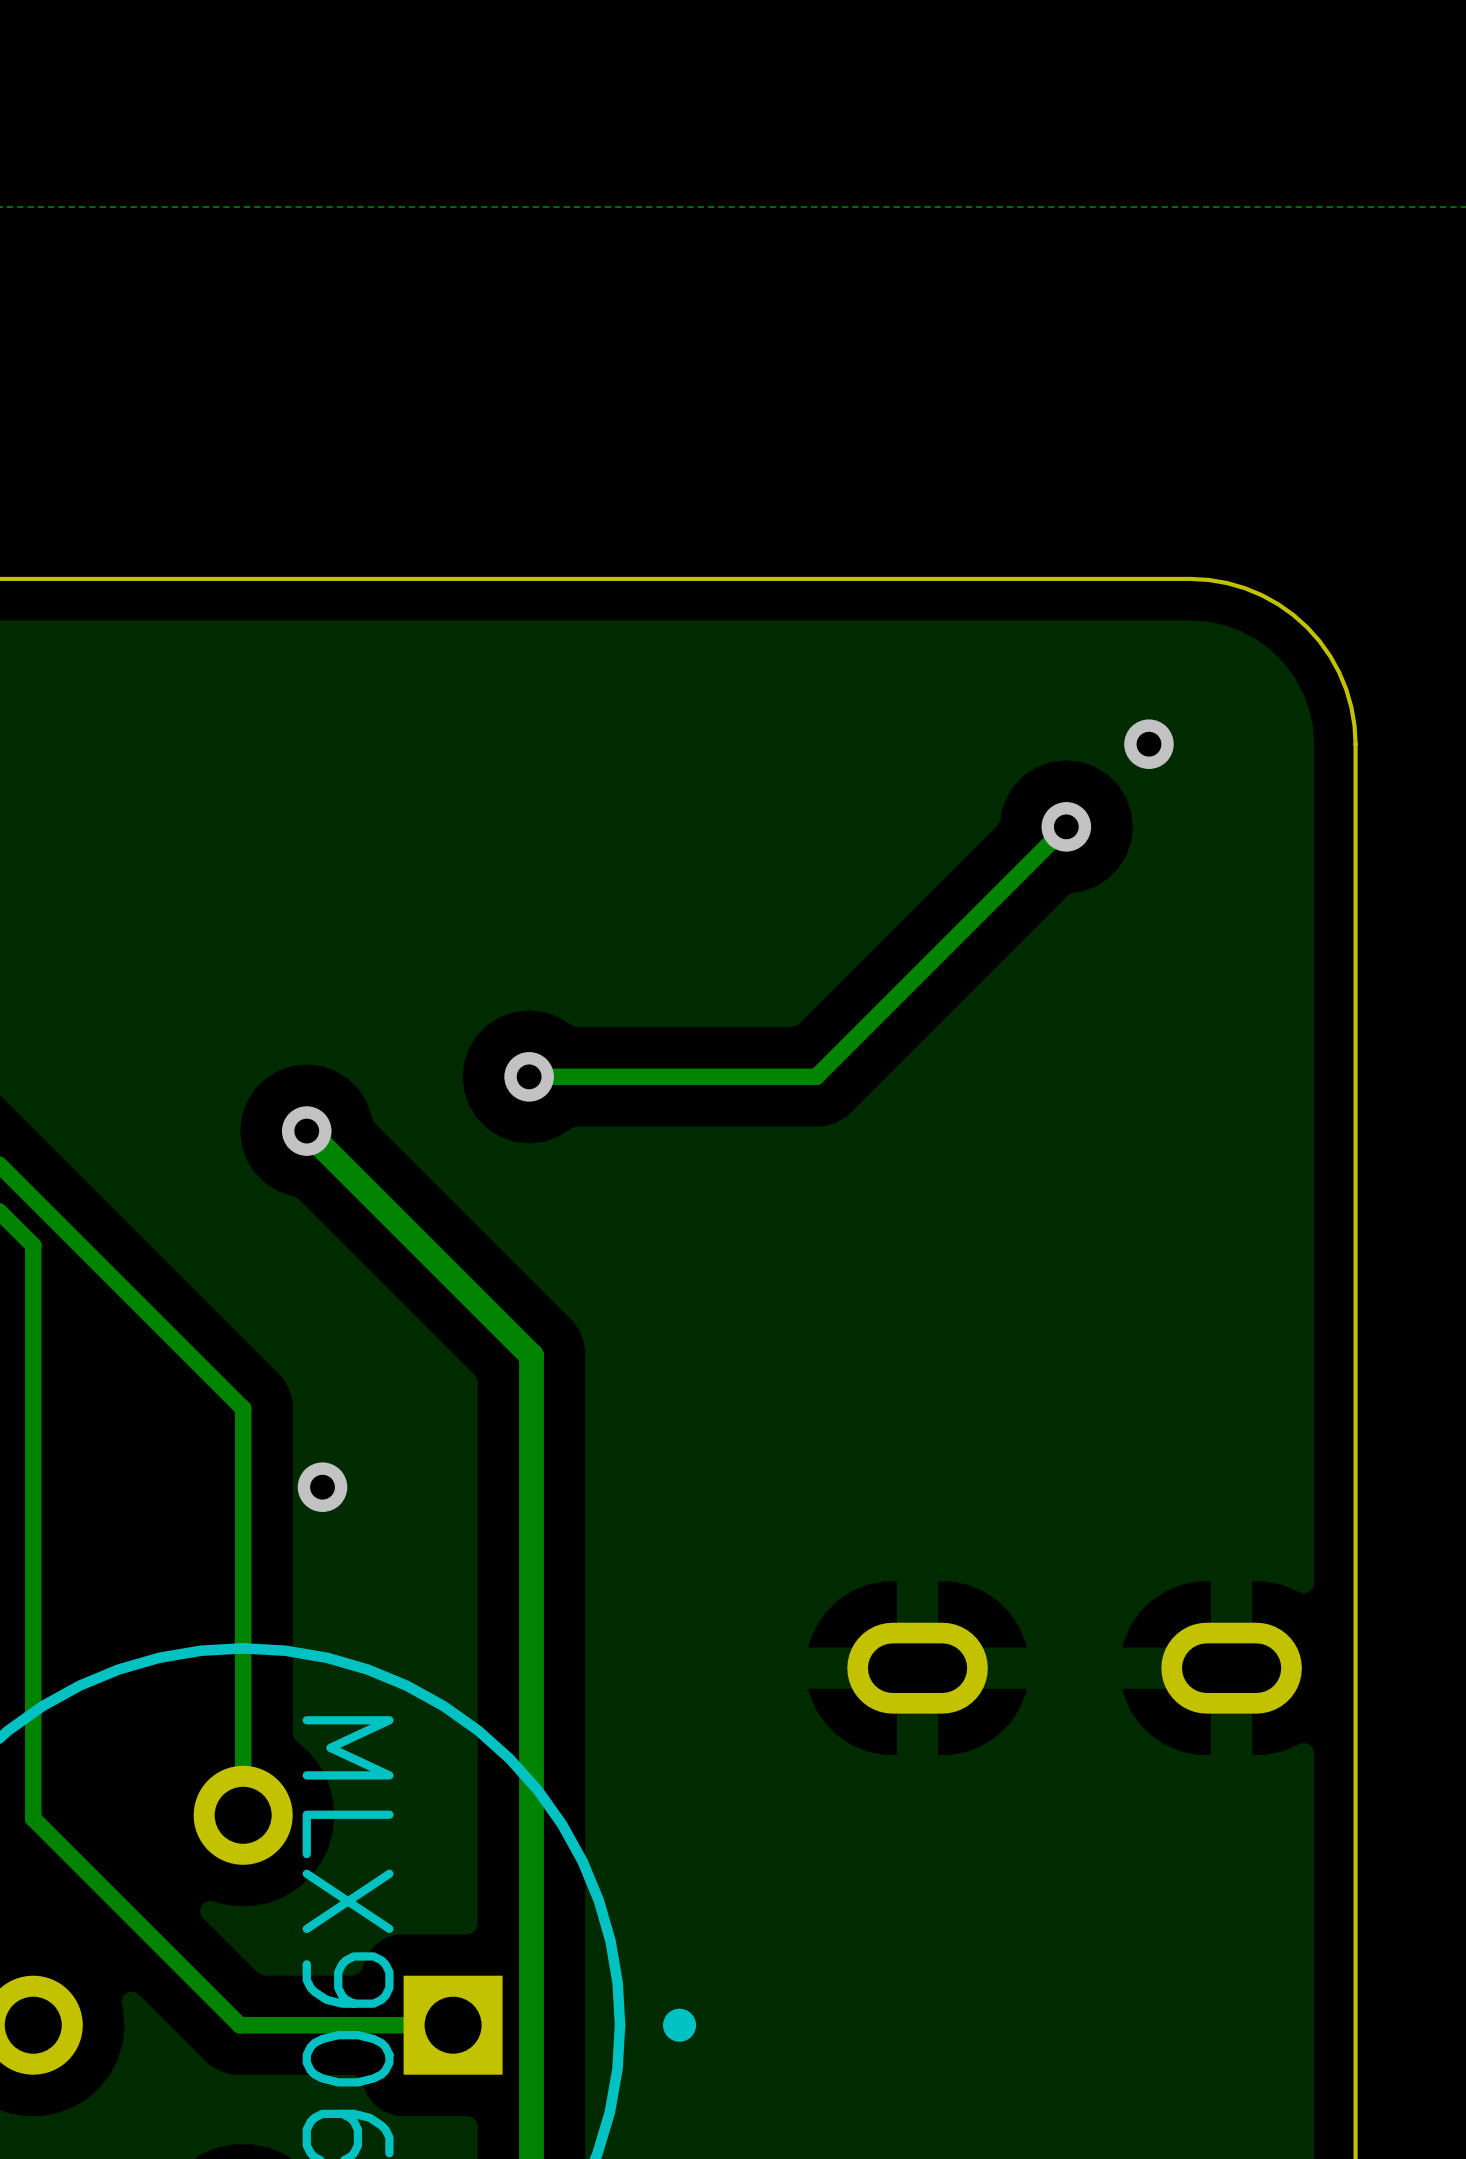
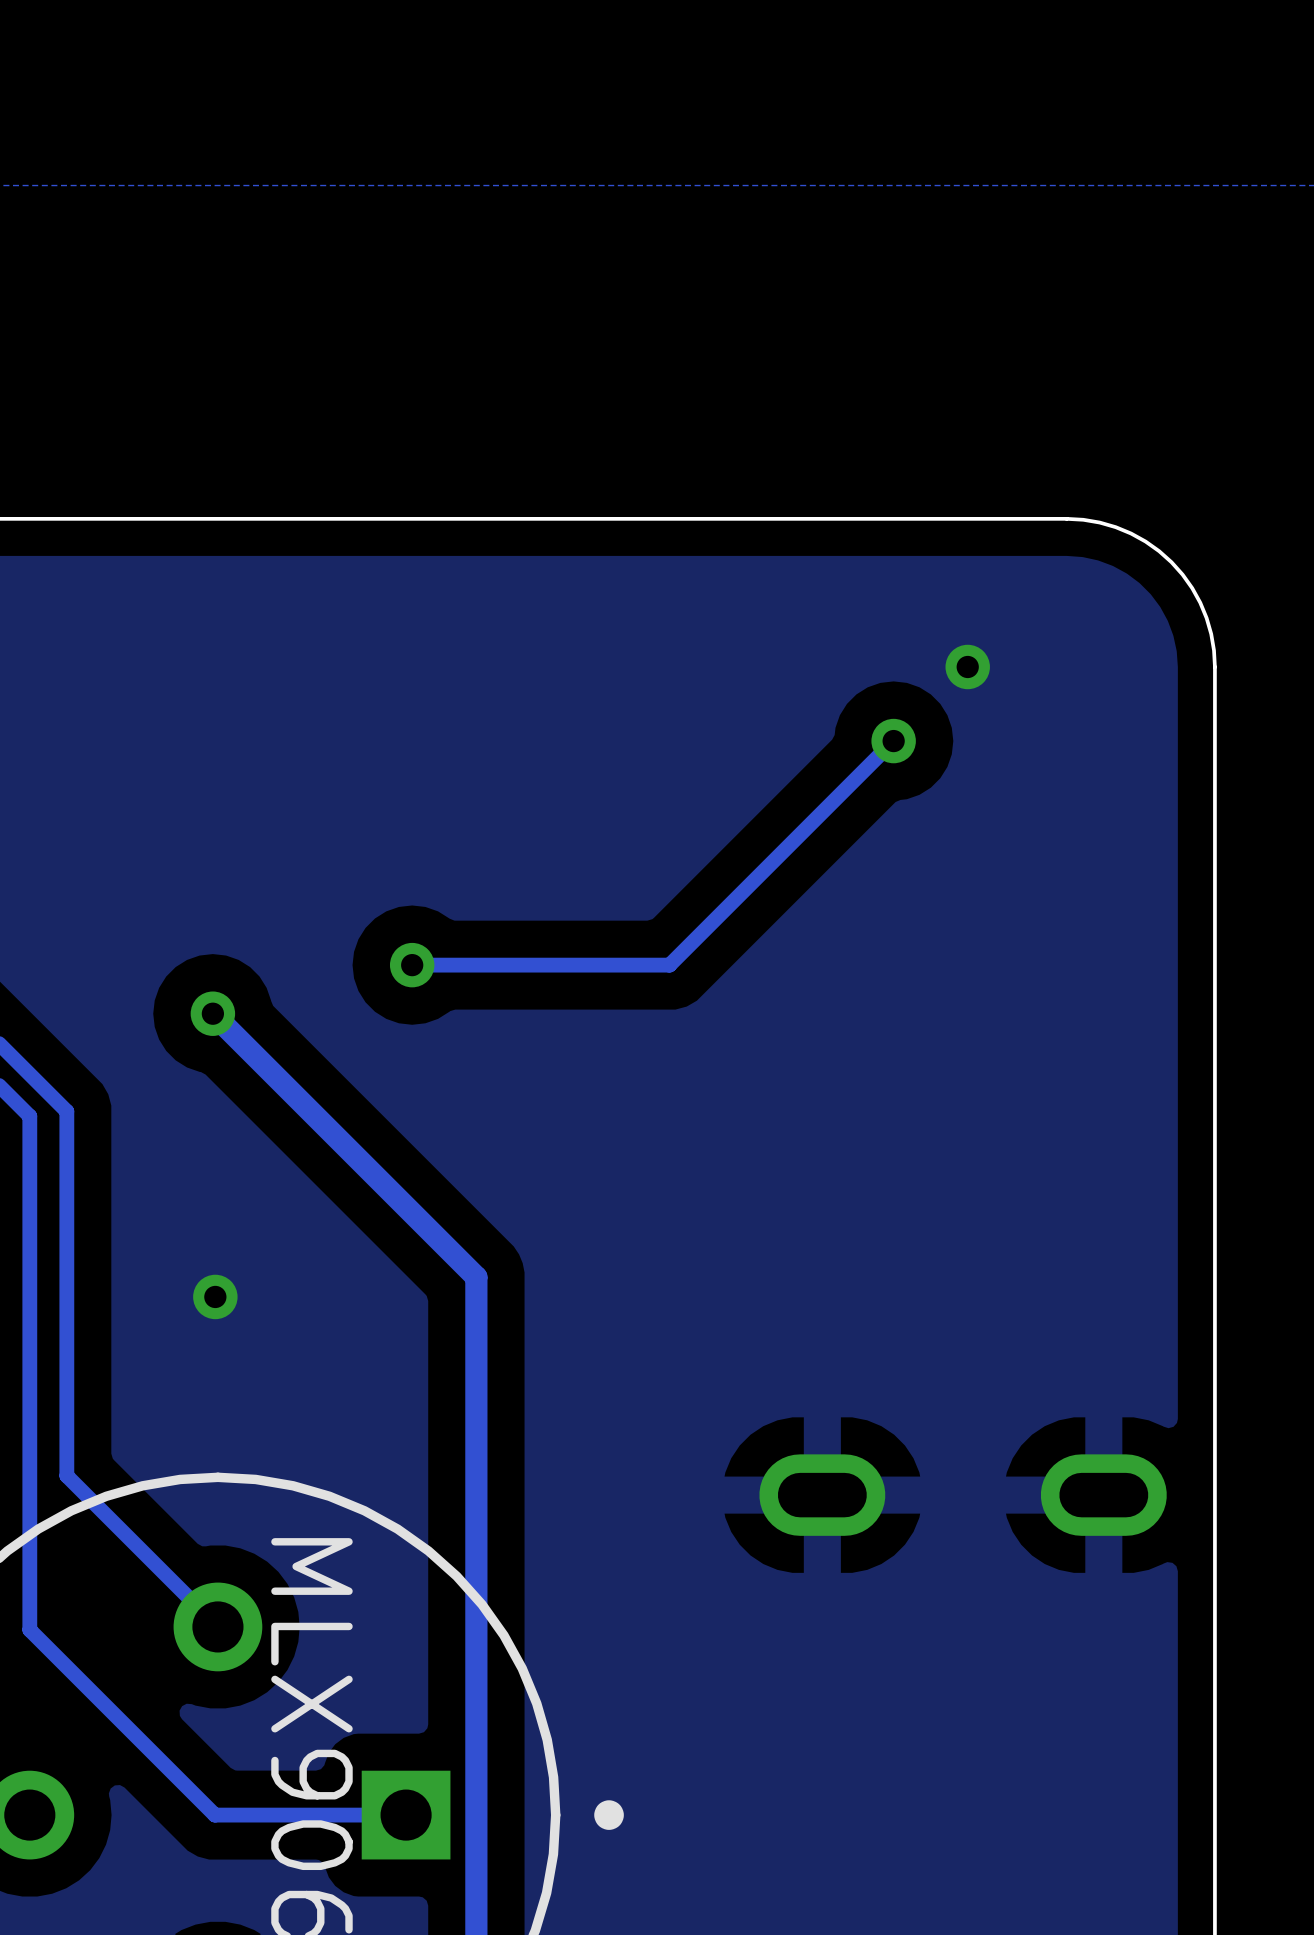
via: none -> (967, 666)
via: (1148, 744) -> none
via: none -> (893, 741)
track: (1066, 826) (816, 1076) (747, 1076) -> (893, 741) (669, 965)
via: (1066, 826) -> none
track: none -> (474, 965) (412, 965)
via position: (529, 1076) -> (412, 965)
track: (306, 1131) (531, 1355) (531, 1425) -> (212, 1013) (476, 1277)
via position: (306, 1131) -> (212, 1013)
track: (74, 1240) (243, 1408) (243, 1815) -> (66, 1111) (66, 1475) (217, 1626)
via position: (322, 1487) -> (215, 1296)

